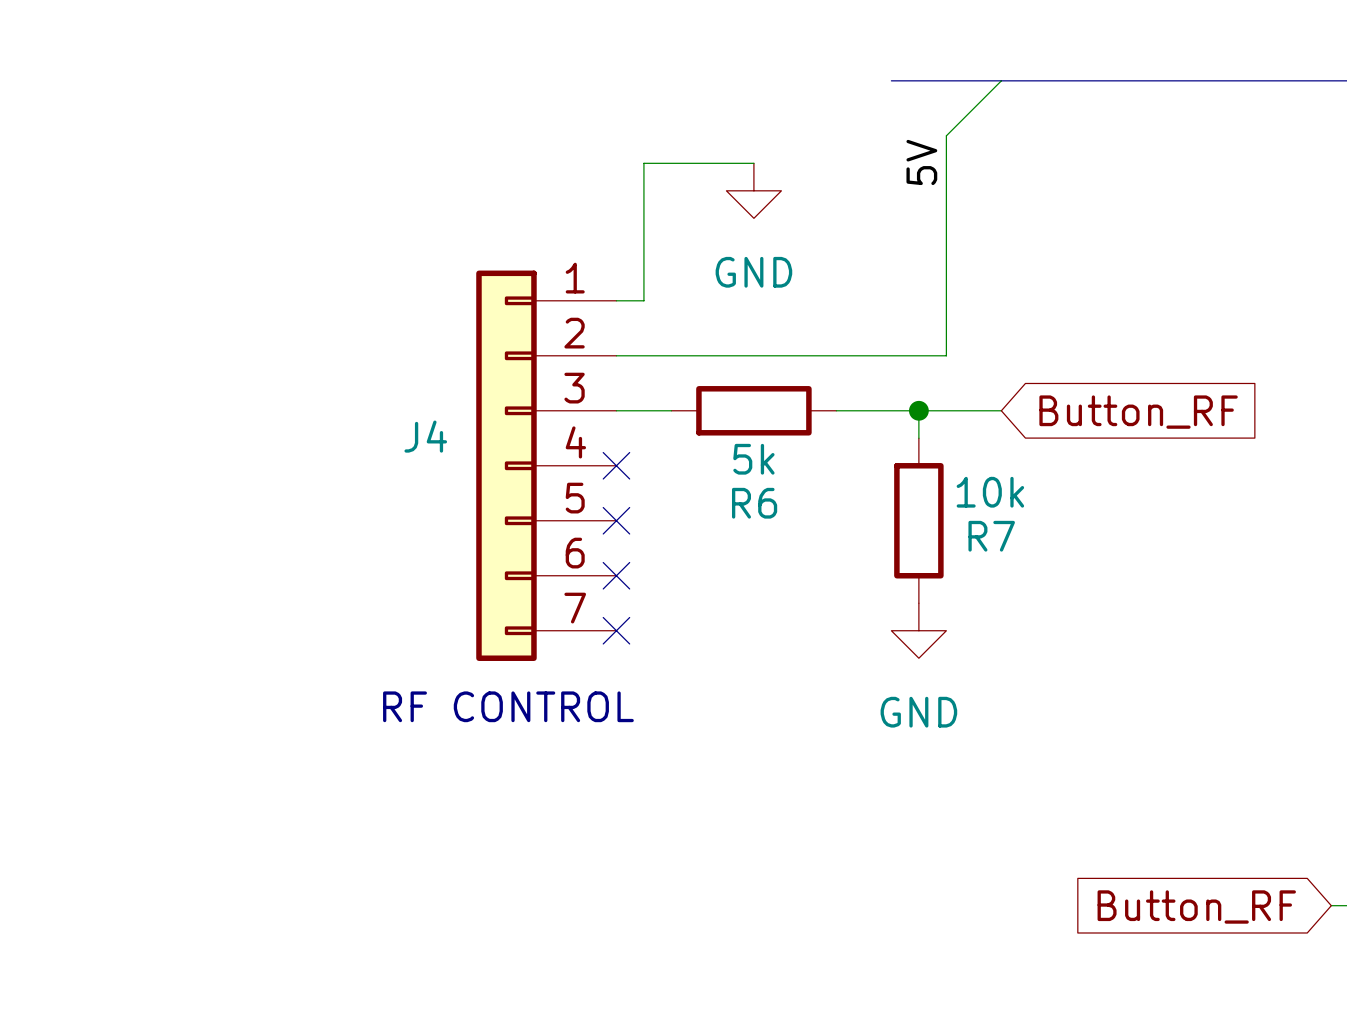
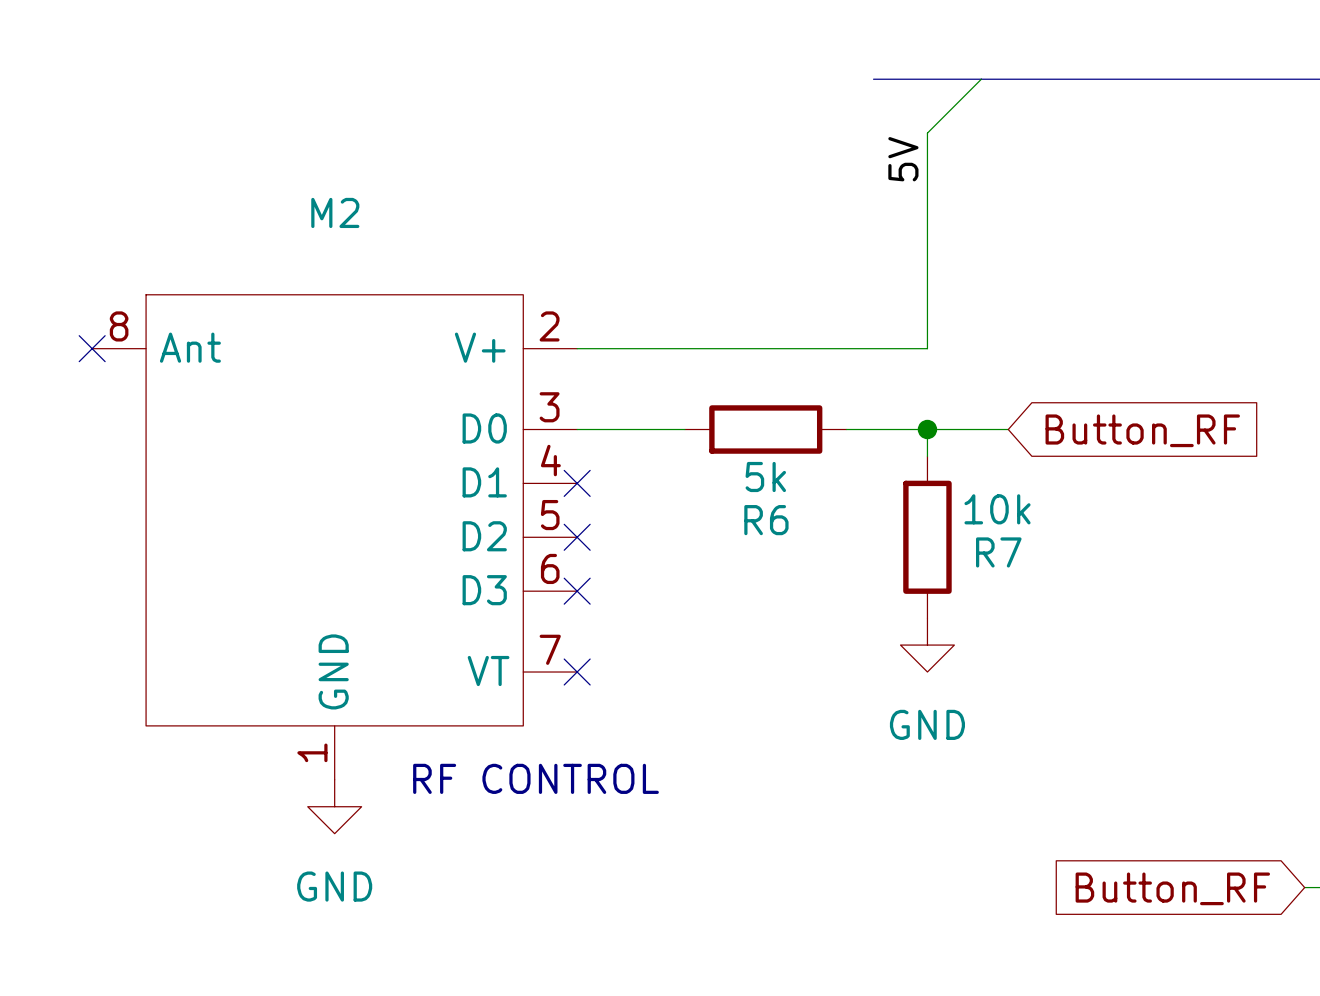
wire: (753, 163) (643, 163) (643, 300) (616, 300) -> none
power symbol: GND (753, 190) -> none
no-connect mark: none -> (92, 348)
wire: (616, 410) (671, 410) -> none
R6 position: (753, 410) -> (765, 429)
wire: (836, 410) (1001, 410) -> (846, 429) (1008, 429)
wire: (918, 410) (918, 438) -> (927, 429) (927, 456)
junction position: (918, 410) -> (927, 429)
global label position: Button_RF (1138, 412) -> Button_RF (1142, 430)
wire: none -> (577, 429) (684, 429)
J4: (546, 465) -> none
no-connect mark: (616, 465) -> none
no-connect mark: none -> (577, 483)
no-connect mark: (616, 520) -> none
R7 position: (918, 520) -> (927, 537)
M2: none -> (334, 537)
no-connect mark: none -> (577, 537)
no-connect mark: (616, 575) -> none
no-connect mark: none -> (577, 591)
no-connect mark: (616, 630) -> none
power symbol position: GND (918, 630) -> GND (927, 645)
no-connect mark: none -> (577, 672)
text position: RF CONTROL (508, 706) -> RF CONTROL (535, 778)
power symbol: none -> GND (334, 806)

